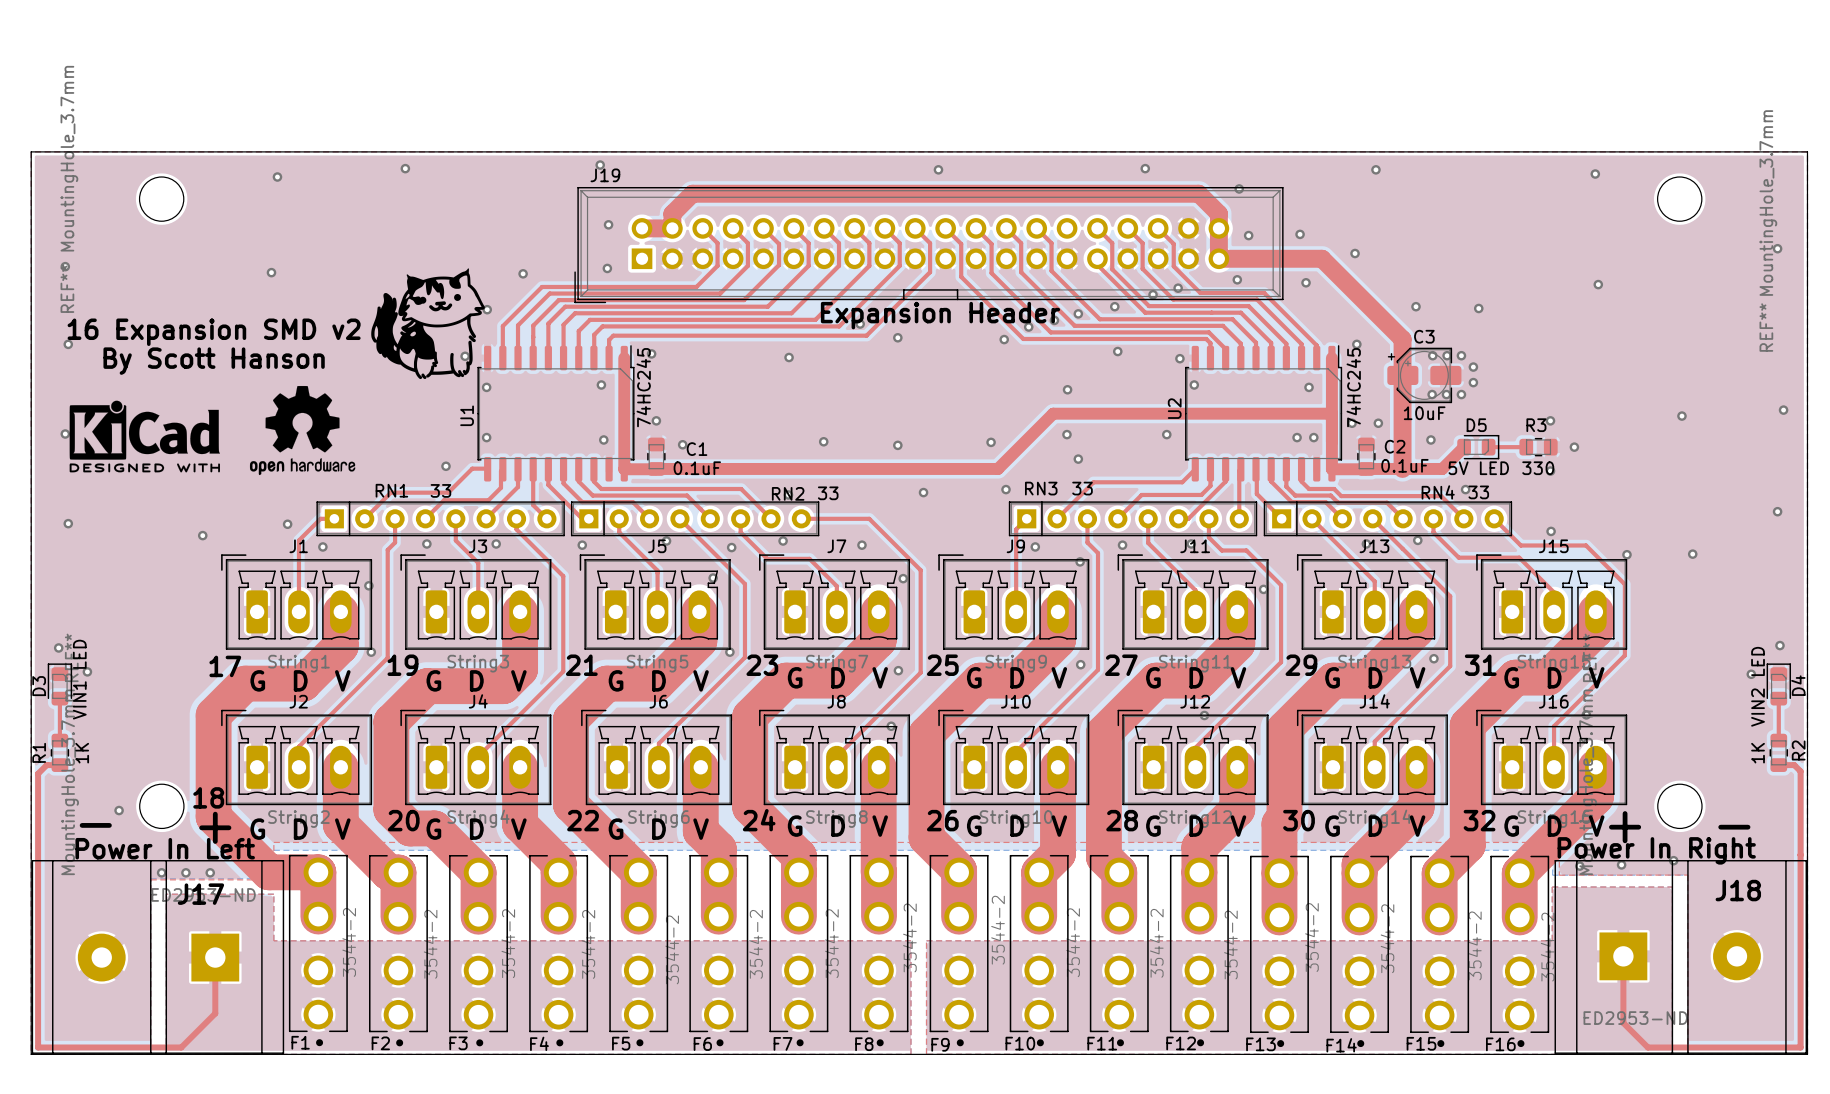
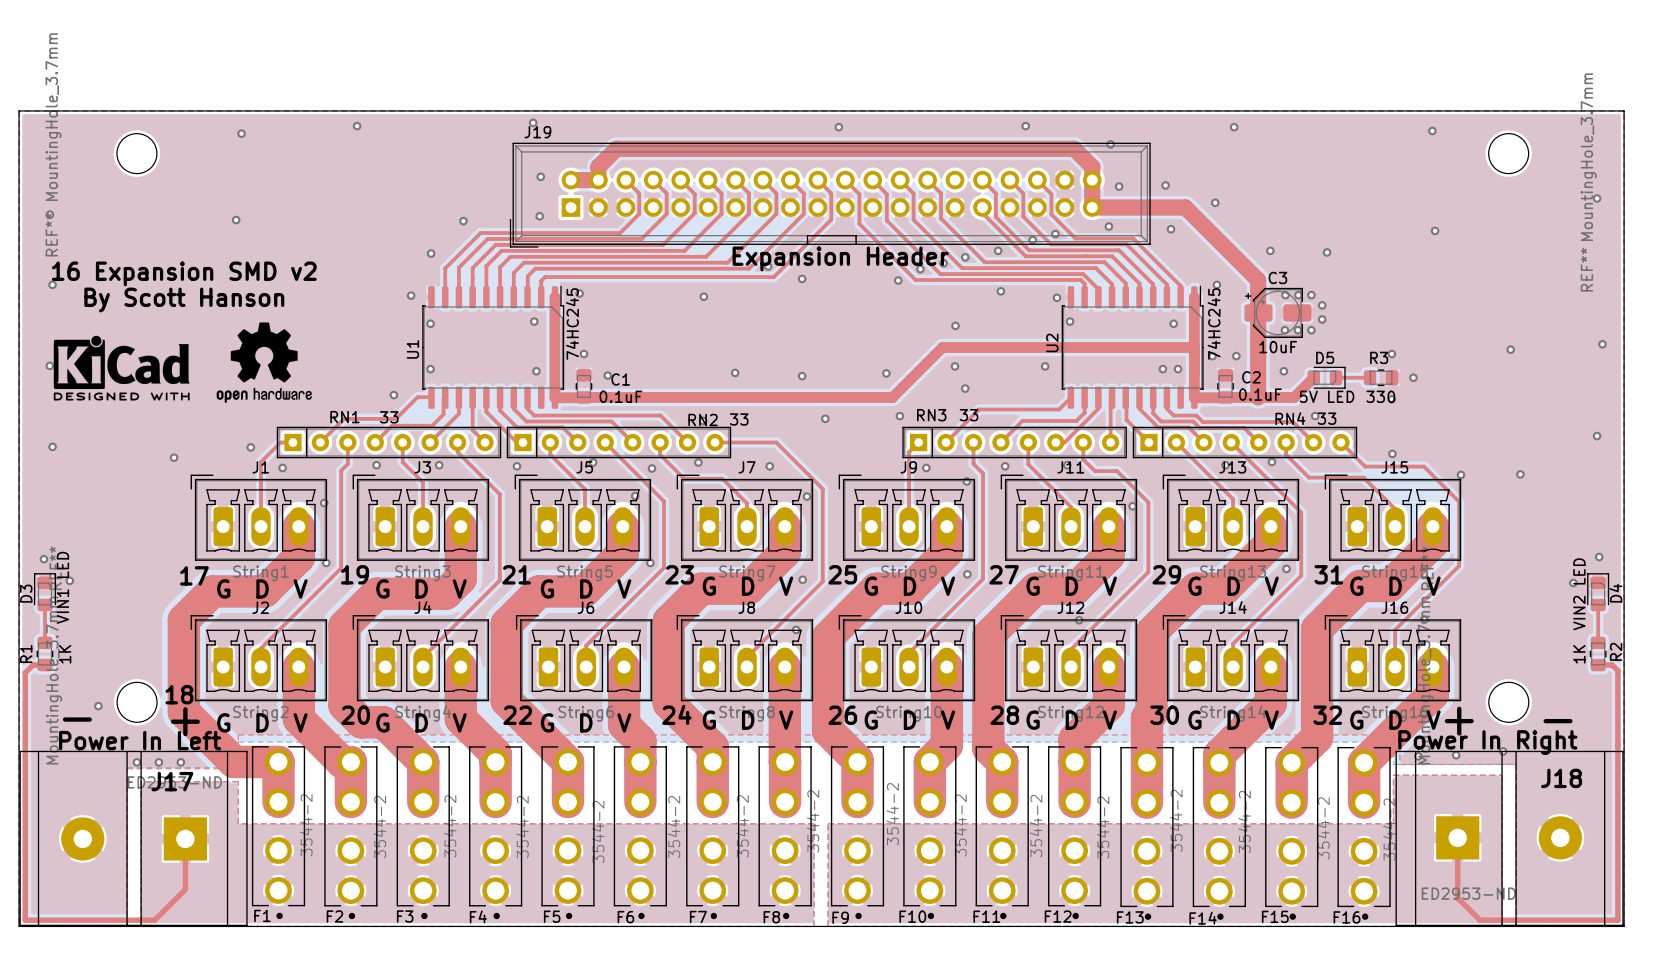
drawing: [371, 268, 485, 380] -> none

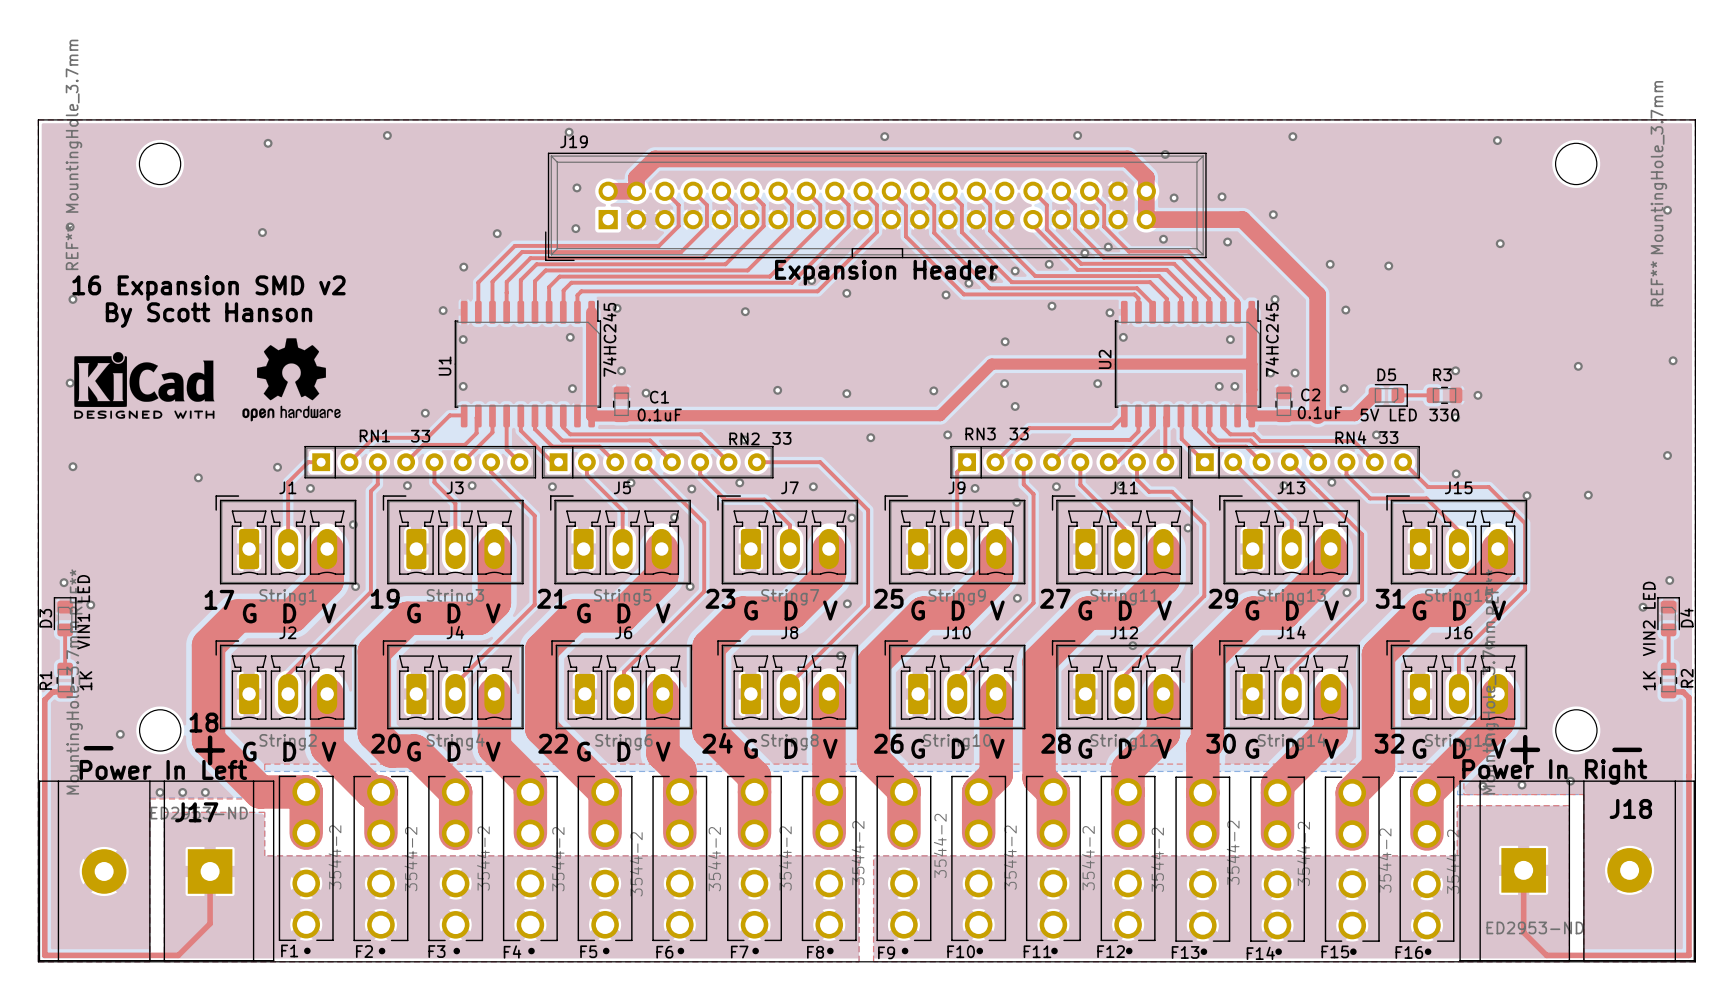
via: (1298, 295) -> none
via: (1311, 295) -> none
via: (1322, 305) -> none
C3: 10uF (1277, 312) -> none
via: (1322, 319) -> none
via: (1284, 330) -> none
via: (1297, 330) -> none
via: (1311, 330) -> none

